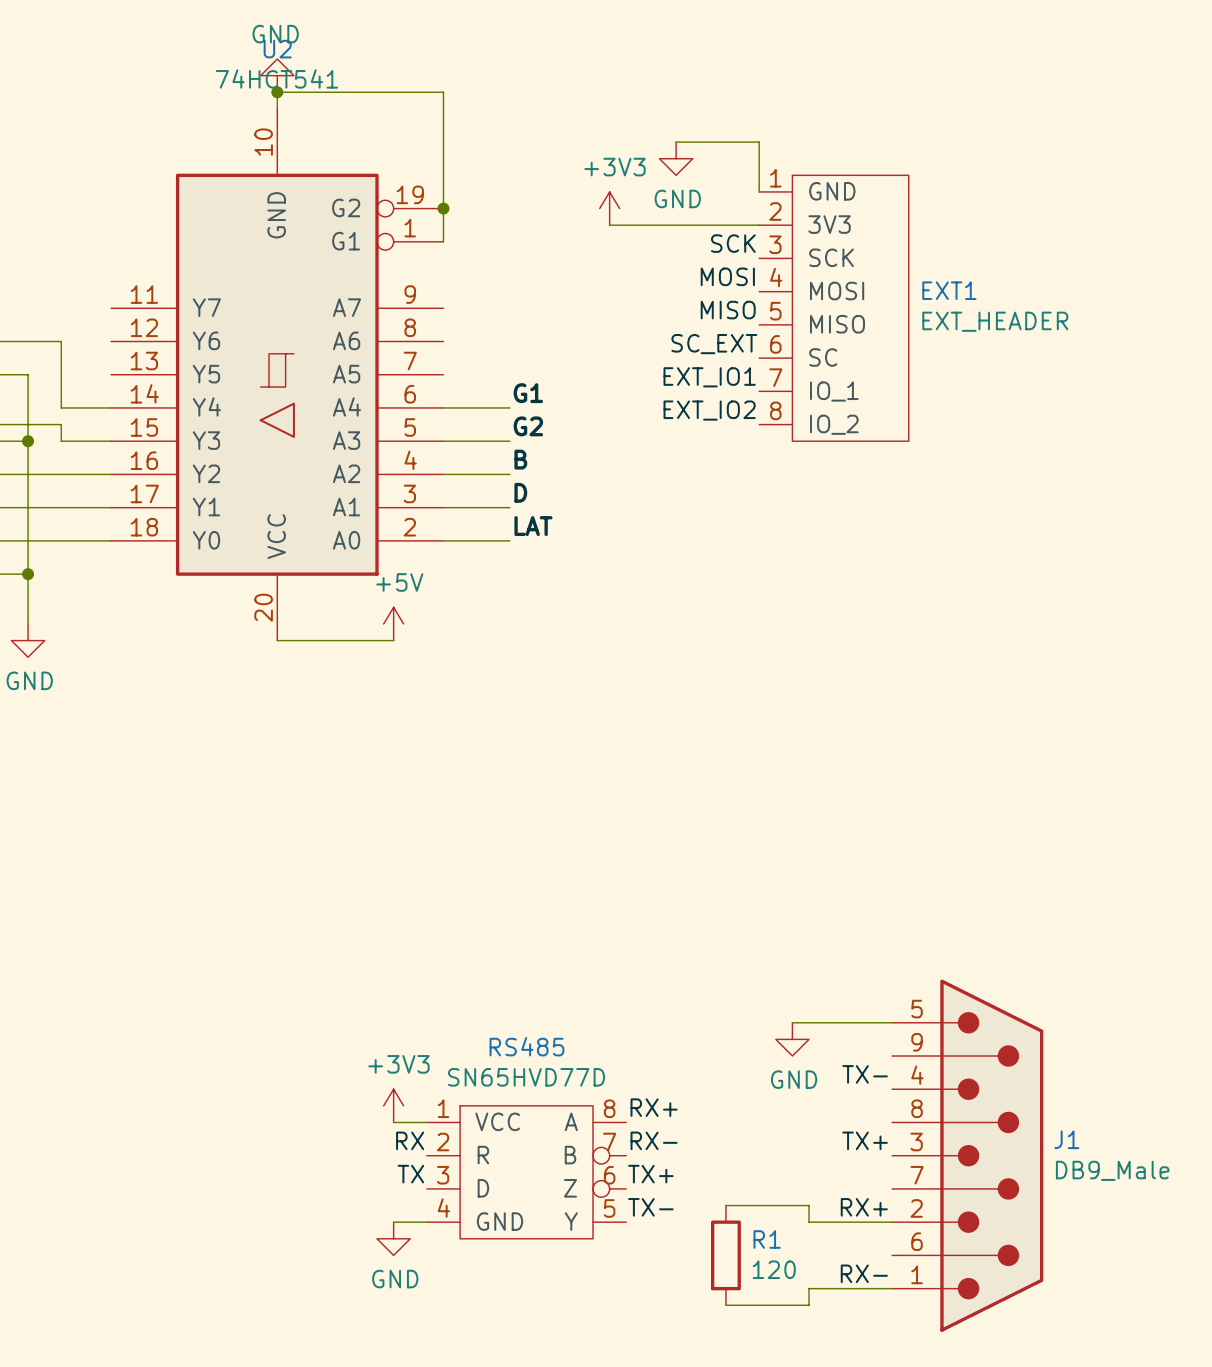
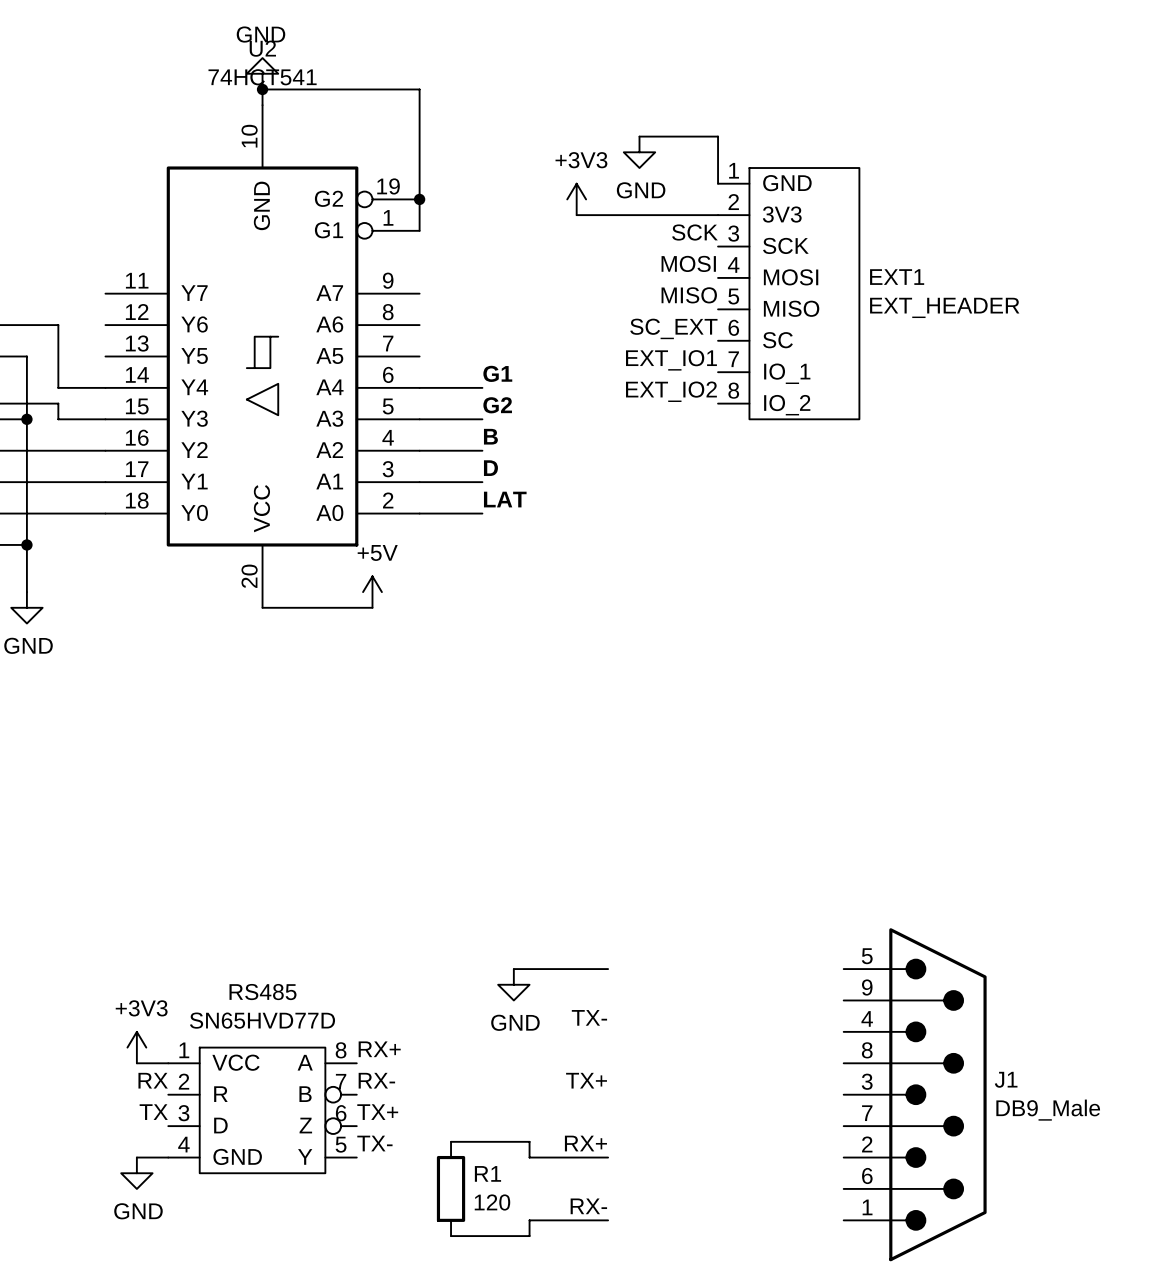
wire: (792, 1022) (892, 1022) -> (513, 969) (608, 969)
power symbol: none -> GND (513, 984)
power symbol: GND (792, 1039) -> none
label: none -> TX- (589, 1017)
label: TX- (865, 1074) -> none
power symbol position: +3V3 (393, 1105) -> +3V3 (136, 1047)
label: none -> RX+ (379, 1049)
label position: RX+ (654, 1107) -> RX+ (585, 1143)
wire: (393, 1122) (426, 1122) -> (136, 1063) (168, 1063)
label: none -> RX- (376, 1080)
label position: RX (410, 1140) -> RX (153, 1080)
label: RX- (654, 1140) -> none
label: TX+ (865, 1140) -> none
RS485 position: (526, 1172) -> (262, 1110)
label: none -> TX+ (377, 1112)
label position: TX (410, 1174) -> TX (153, 1112)
label position: TX+ (650, 1174) -> TX+ (586, 1080)
wire: (725, 1205) (809, 1205) (809, 1222) (892, 1222) -> (451, 1141) (529, 1141) (529, 1157) (608, 1157)
label: none -> TX- (374, 1143)
label: TX- (650, 1207) -> none
label: RX+ (864, 1207) -> none
wire: (393, 1222) (426, 1222) -> (136, 1157) (168, 1157)
power symbol: none -> GND (136, 1173)
power symbol: GND (393, 1238) -> none
R1 position: (725, 1255) -> (451, 1188)
label: none -> RX- (588, 1206)
label: RX- (864, 1273) -> none
wire: (892, 1288) (809, 1288) (809, 1305) (725, 1305) -> (608, 1220) (529, 1220) (529, 1236) (451, 1236)

